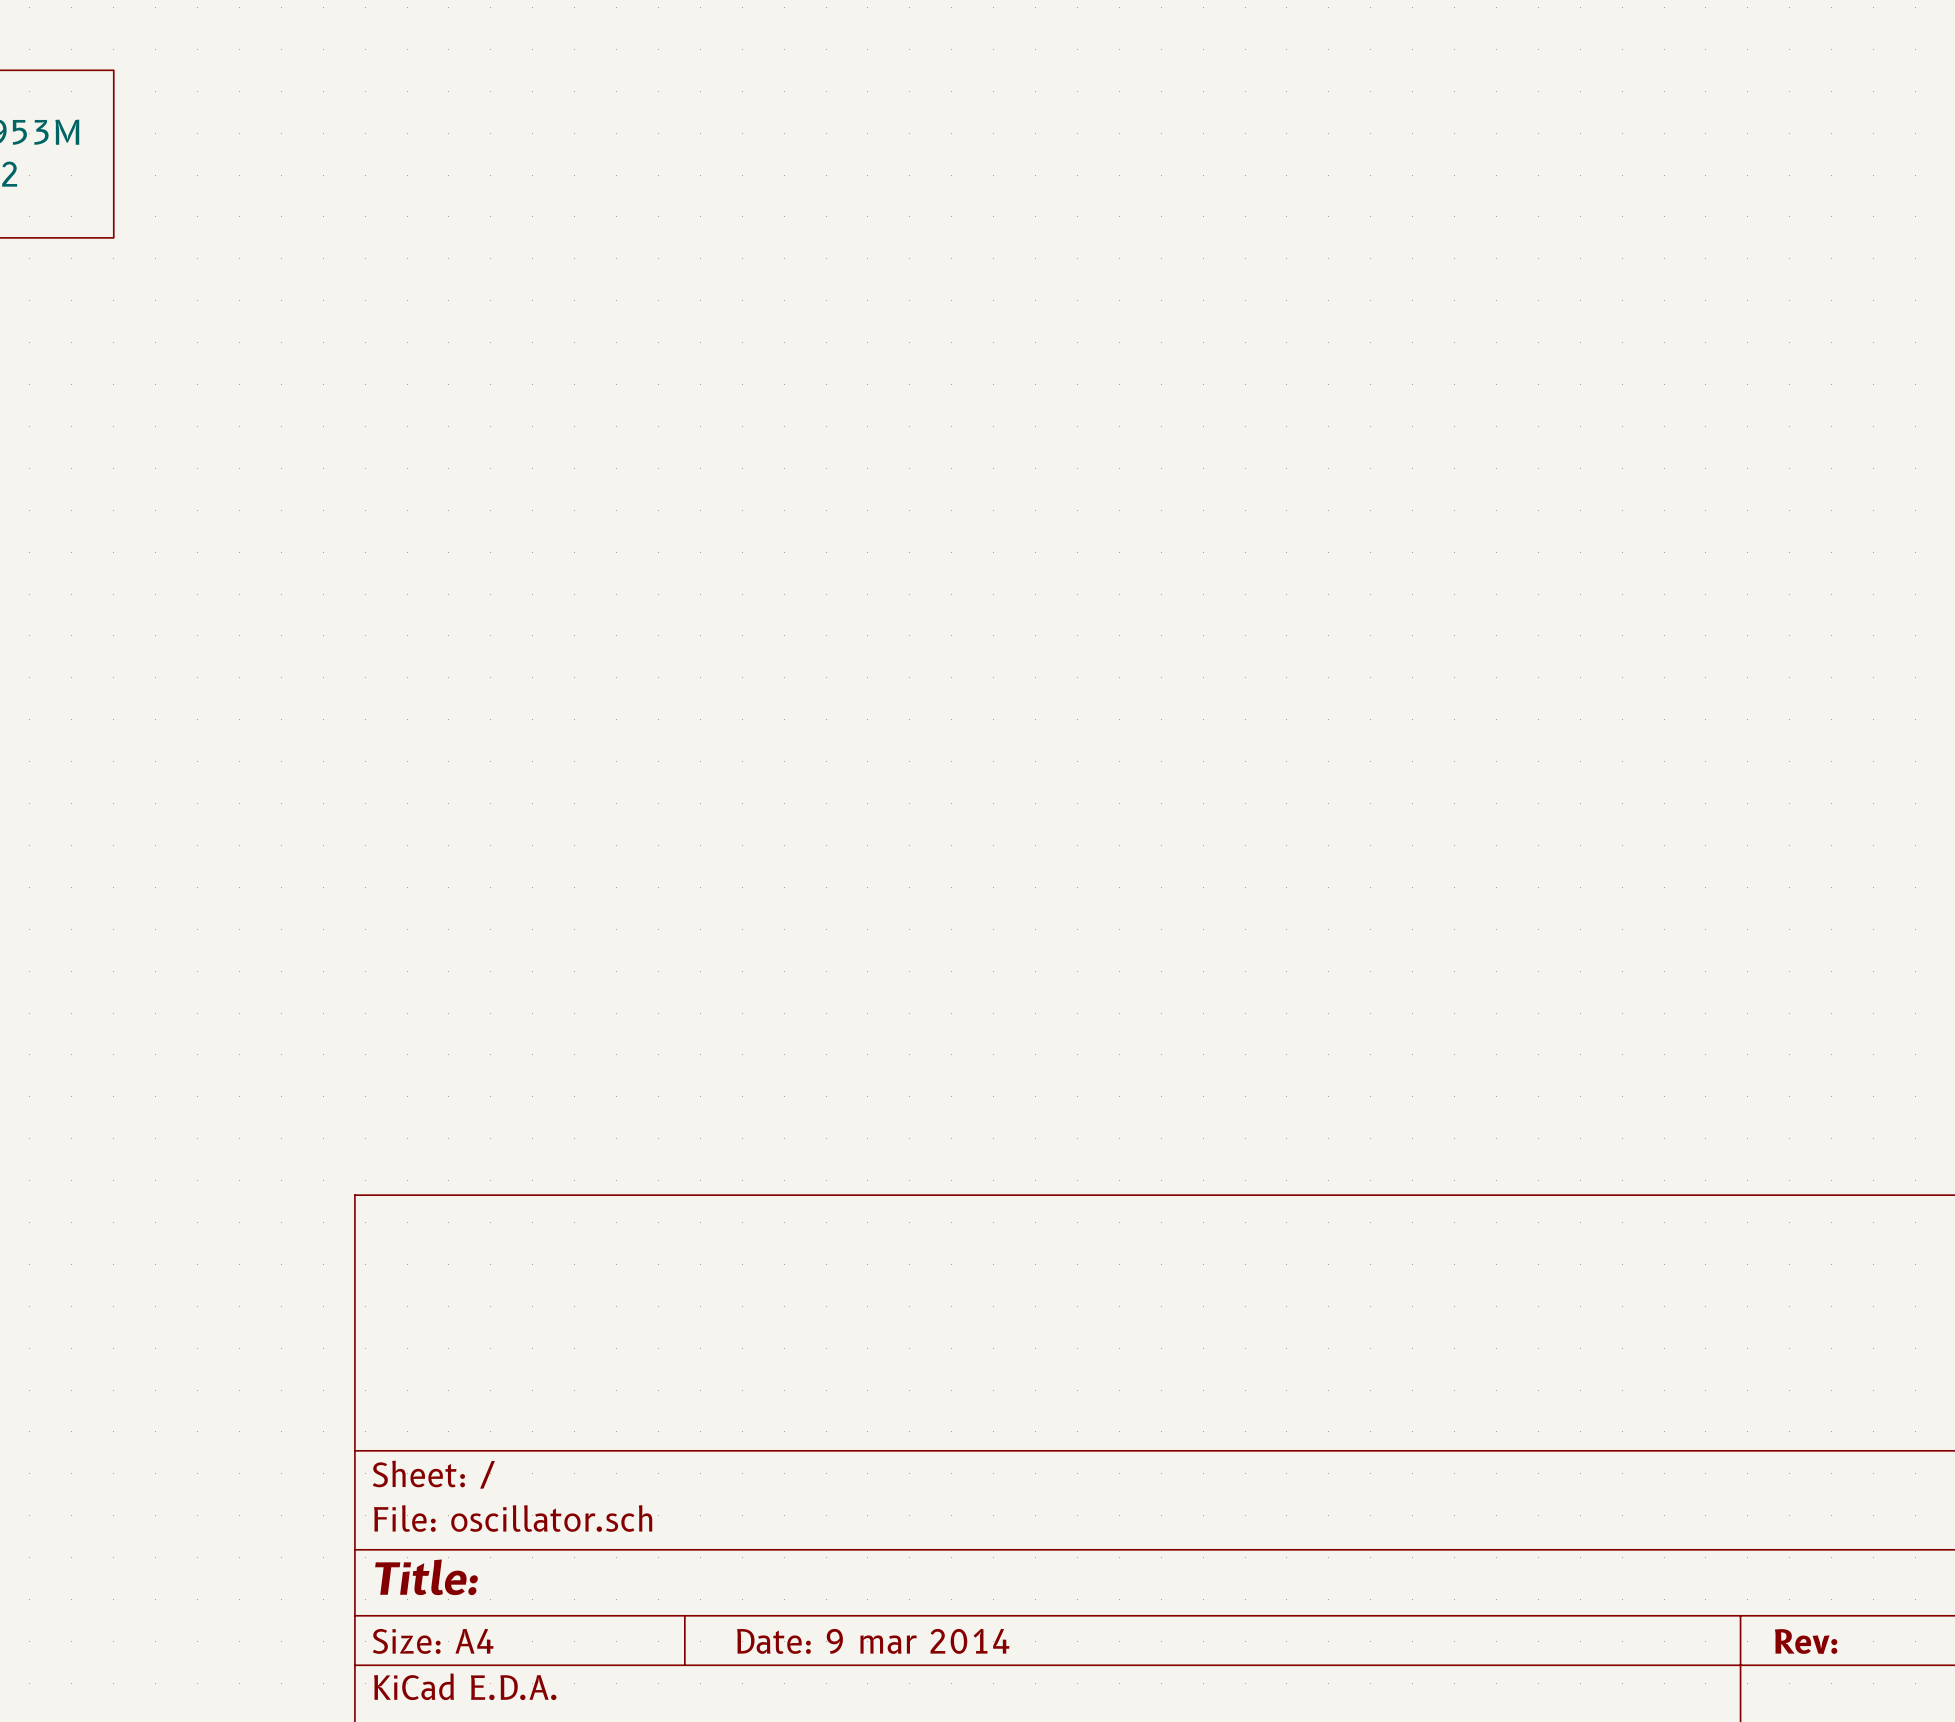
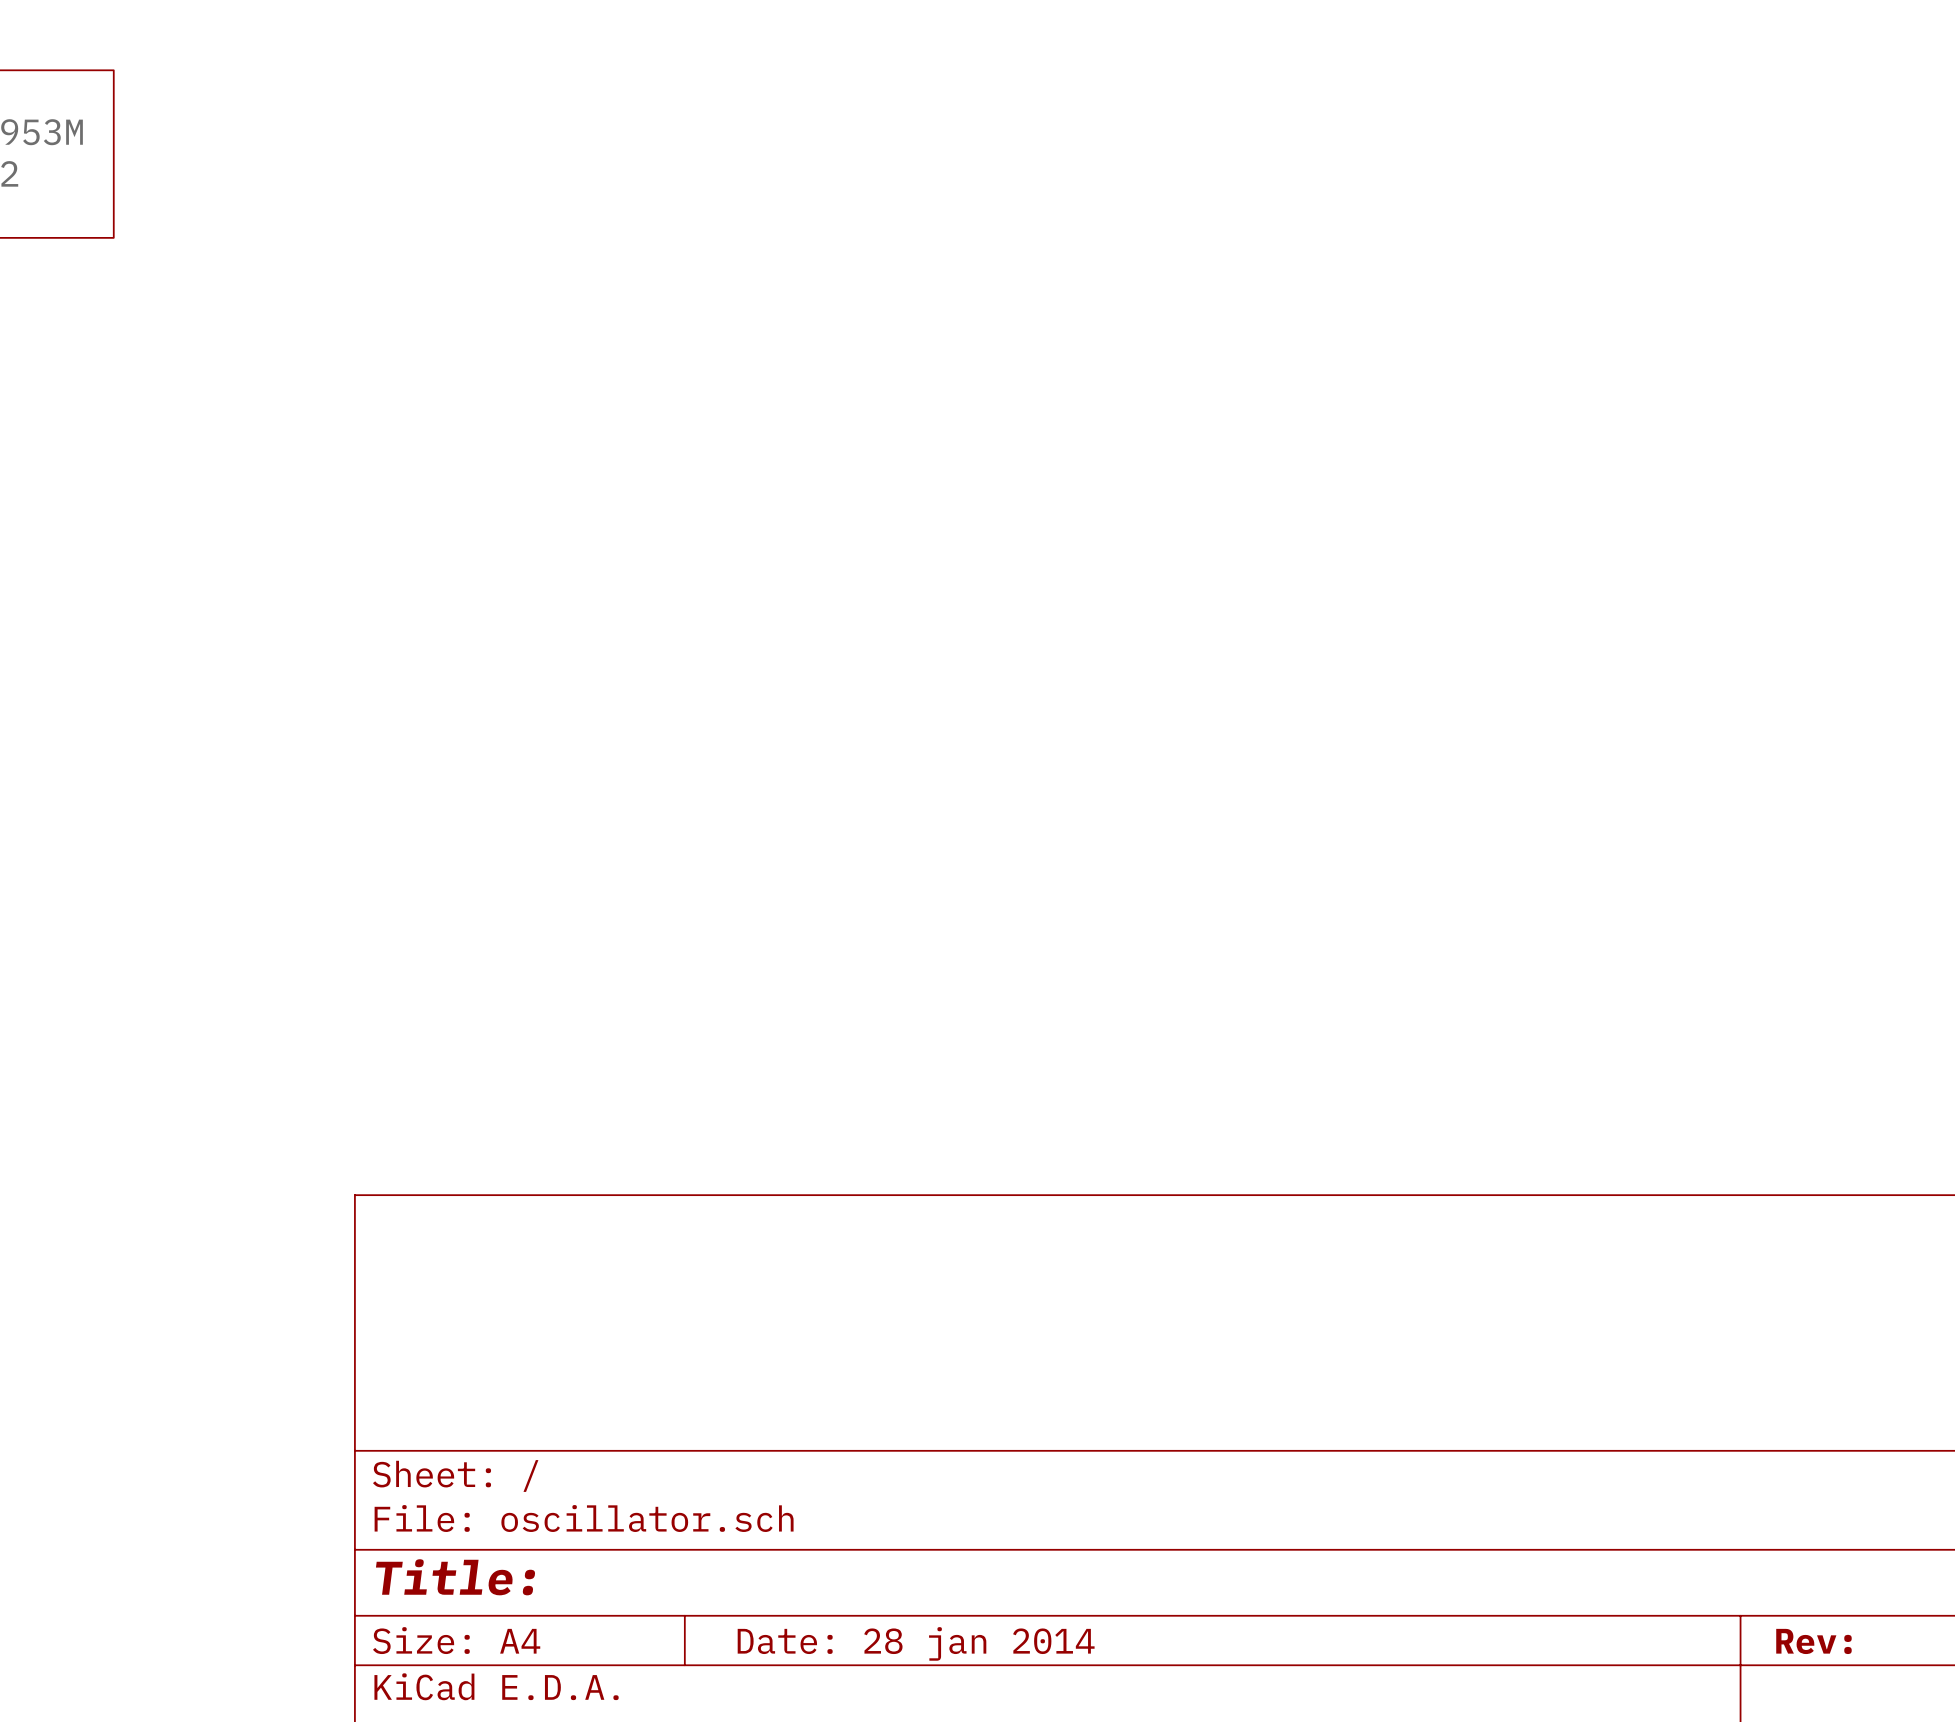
title block: Date: 9 mar 2014 (873, 1641) -> Date: 28 jan 2014 (916, 1643)

